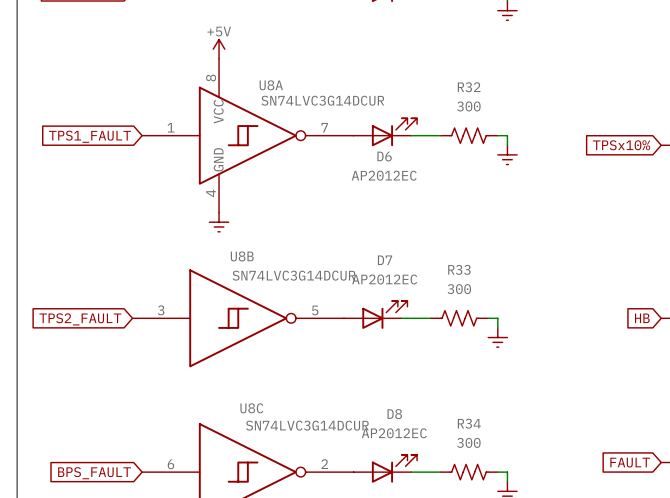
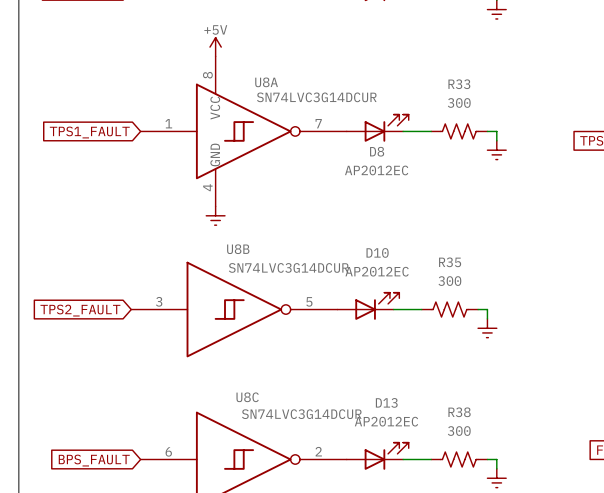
R32 name: R32 (469, 87) -> R33 (459, 84)
D6 name: D6 (384, 156) -> D8 (377, 151)
D7 name: D7 (385, 260) -> D10 (377, 252)
R33 name: R33 (459, 269) -> R35 (450, 262)
D8 name: D8 (394, 414) -> D13 (386, 402)
R34 name: R34 (469, 423) -> R38 (459, 412)

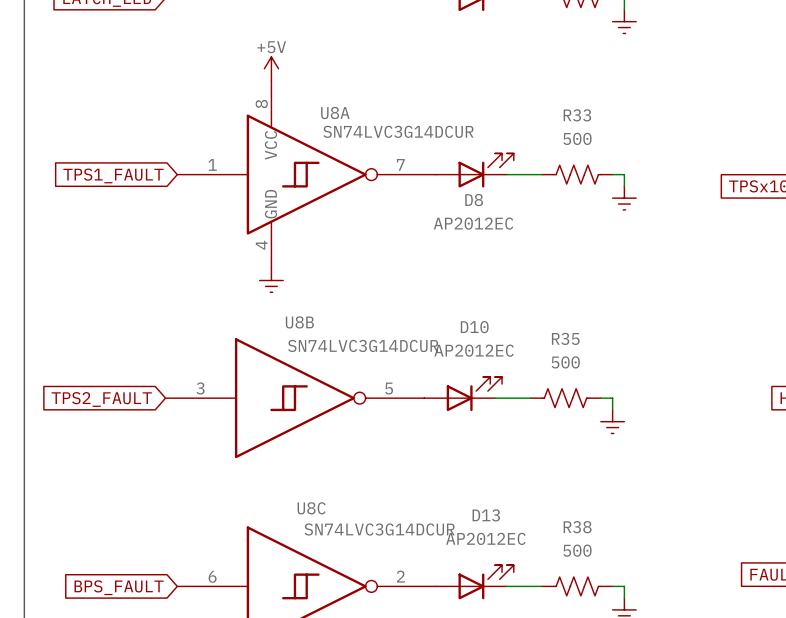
R33 value: 300 (459, 102) -> 500 (577, 138)
R35 value: 300 (449, 281) -> 500 (565, 362)
R38 value: 300 (459, 431) -> 500 (577, 550)

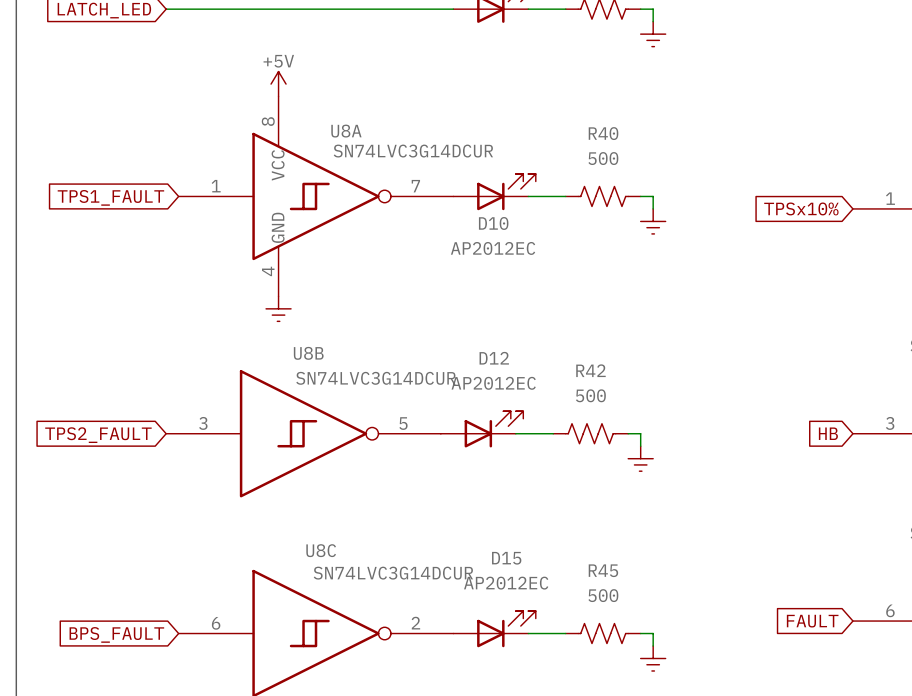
R33 name: R33 (577, 115) -> R40 (603, 133)
D8 name: D8 (474, 200) -> D10 (493, 223)
D10 name: D10 (474, 327) -> D12 (494, 358)
R35 name: R35 (565, 338) -> R42 (590, 370)
D13 name: D13 (486, 515) -> D15 (506, 558)
R38 name: R38 (577, 527) -> R45 (603, 570)

